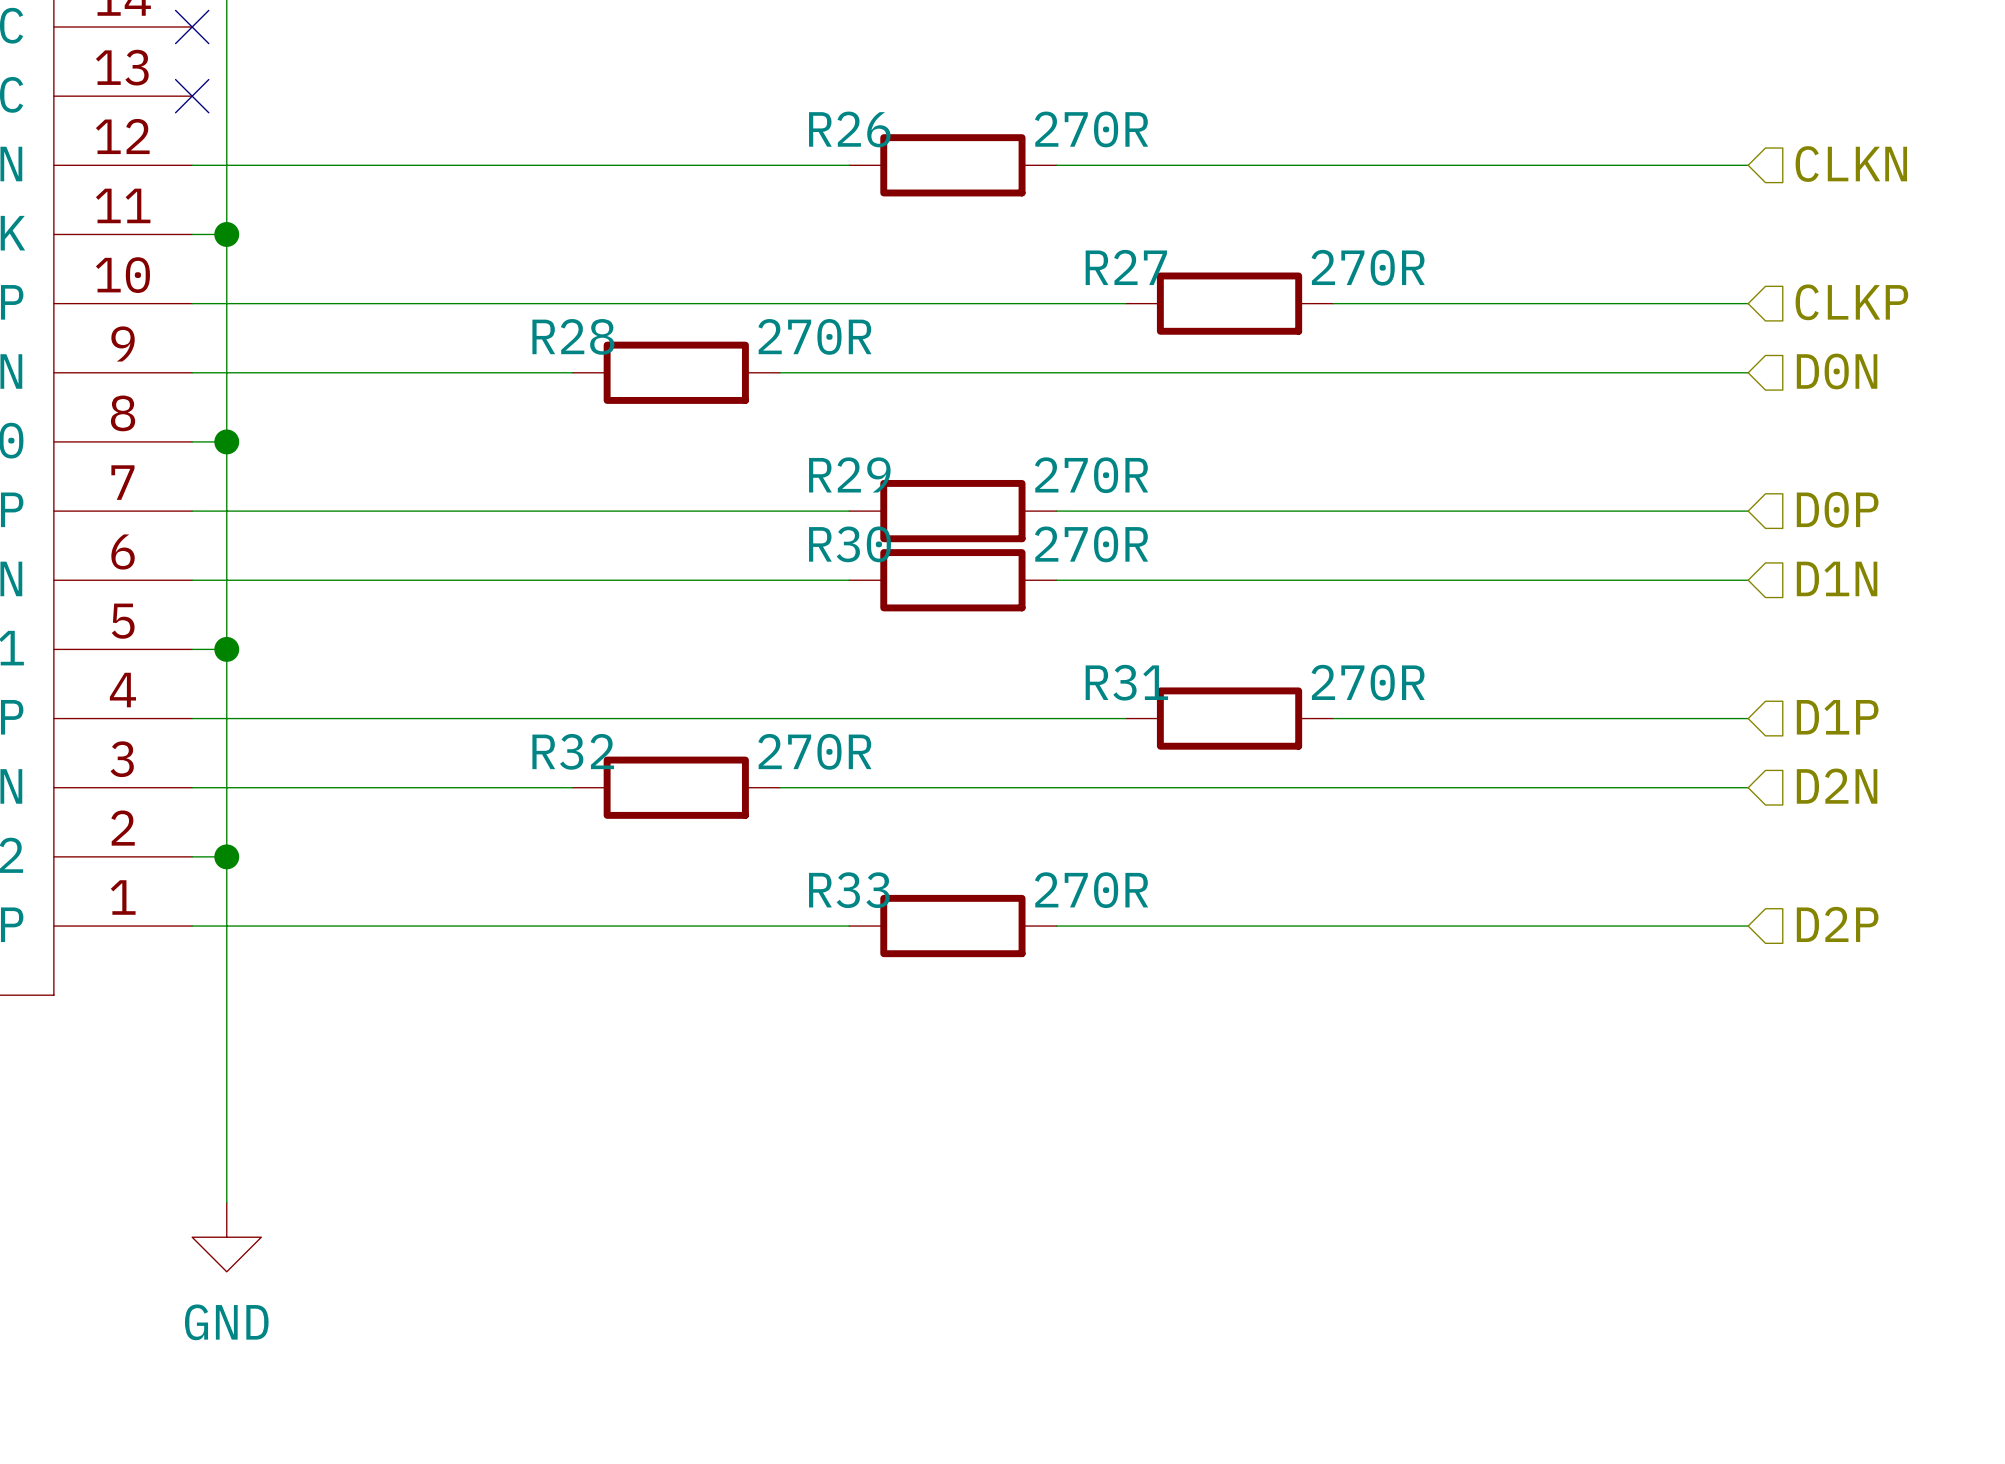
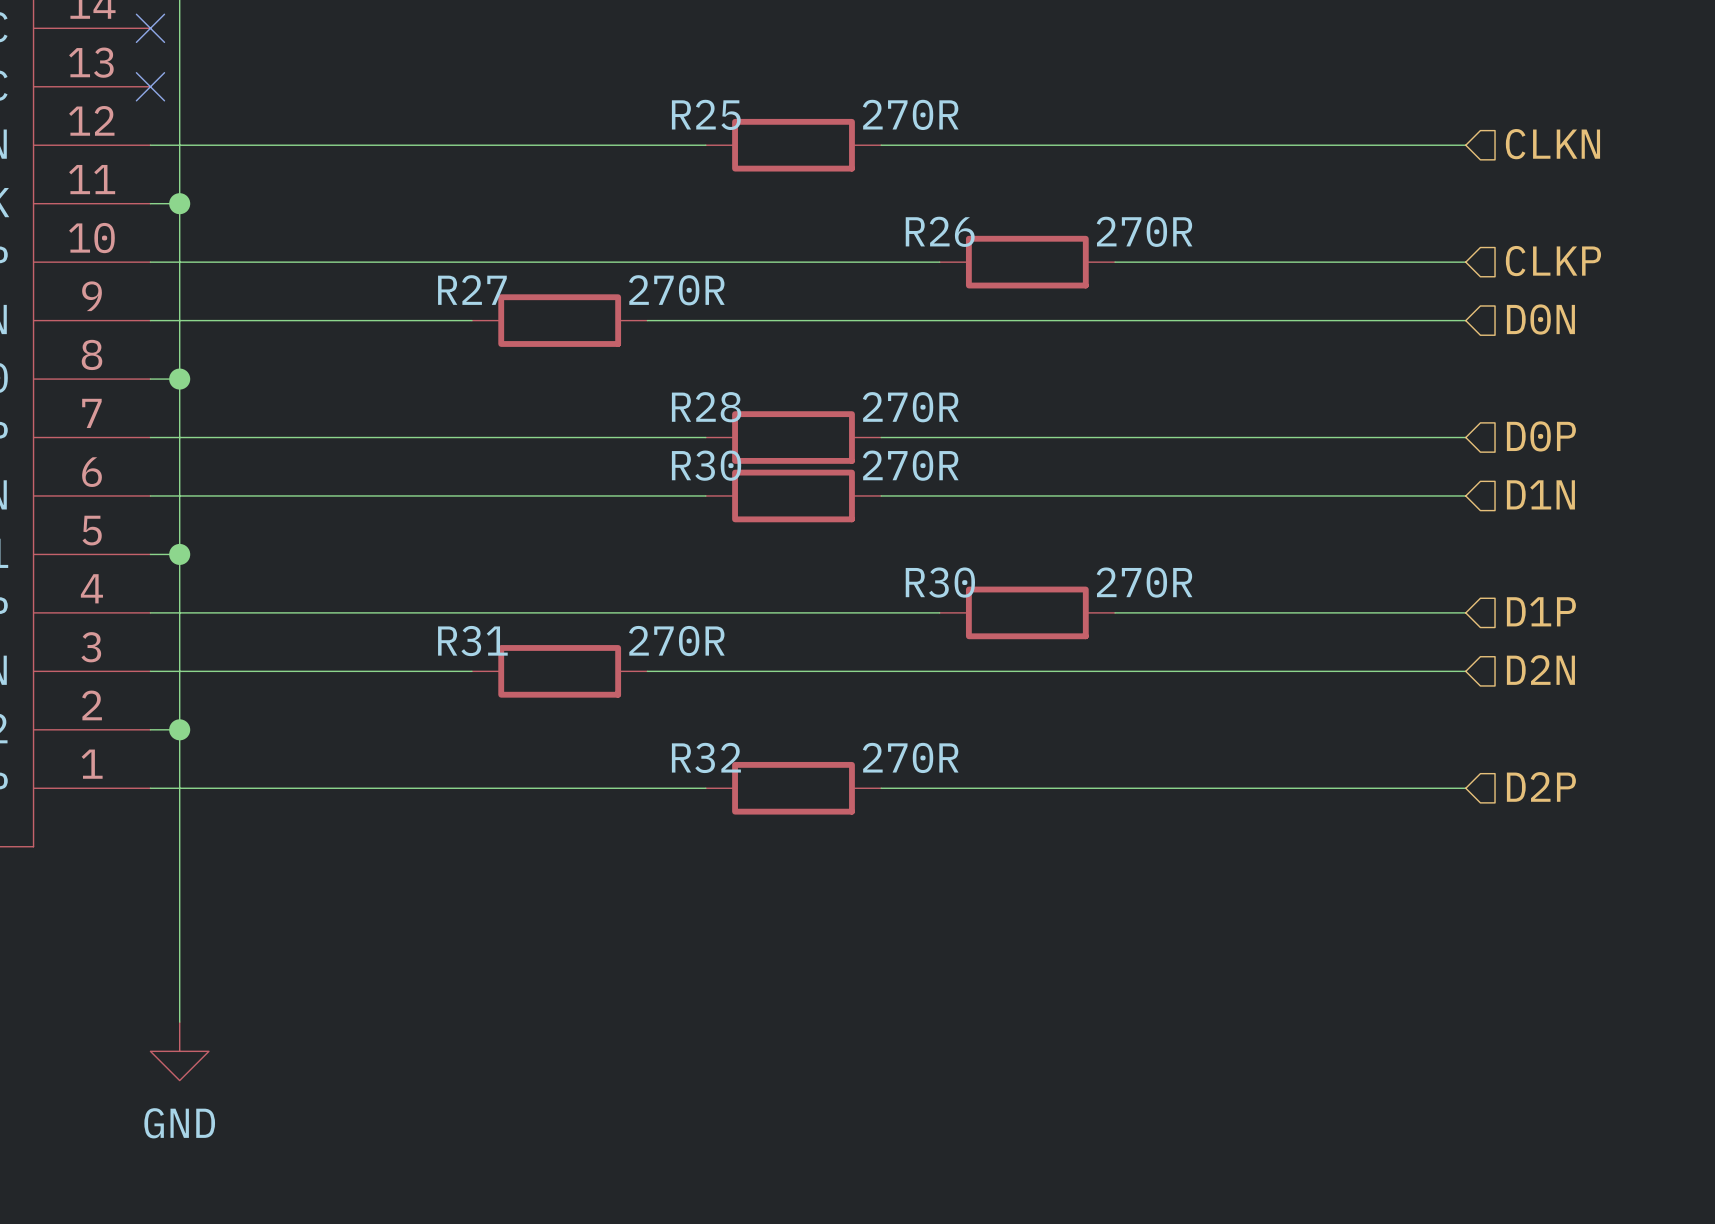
R26 name: R26 (849, 129) -> R25 (706, 114)
R27 name: R27 (1126, 267) -> R26 (940, 231)
R28 name: R28 (573, 336) -> R27 (472, 290)
R29 name: R29 (849, 474) -> R28 (706, 407)
R31 name: R31 (1126, 682) -> R30 (940, 582)
R32 name: R32 (573, 751) -> R31 (472, 641)
R33 name: R33 (849, 890) -> R32 (706, 757)

